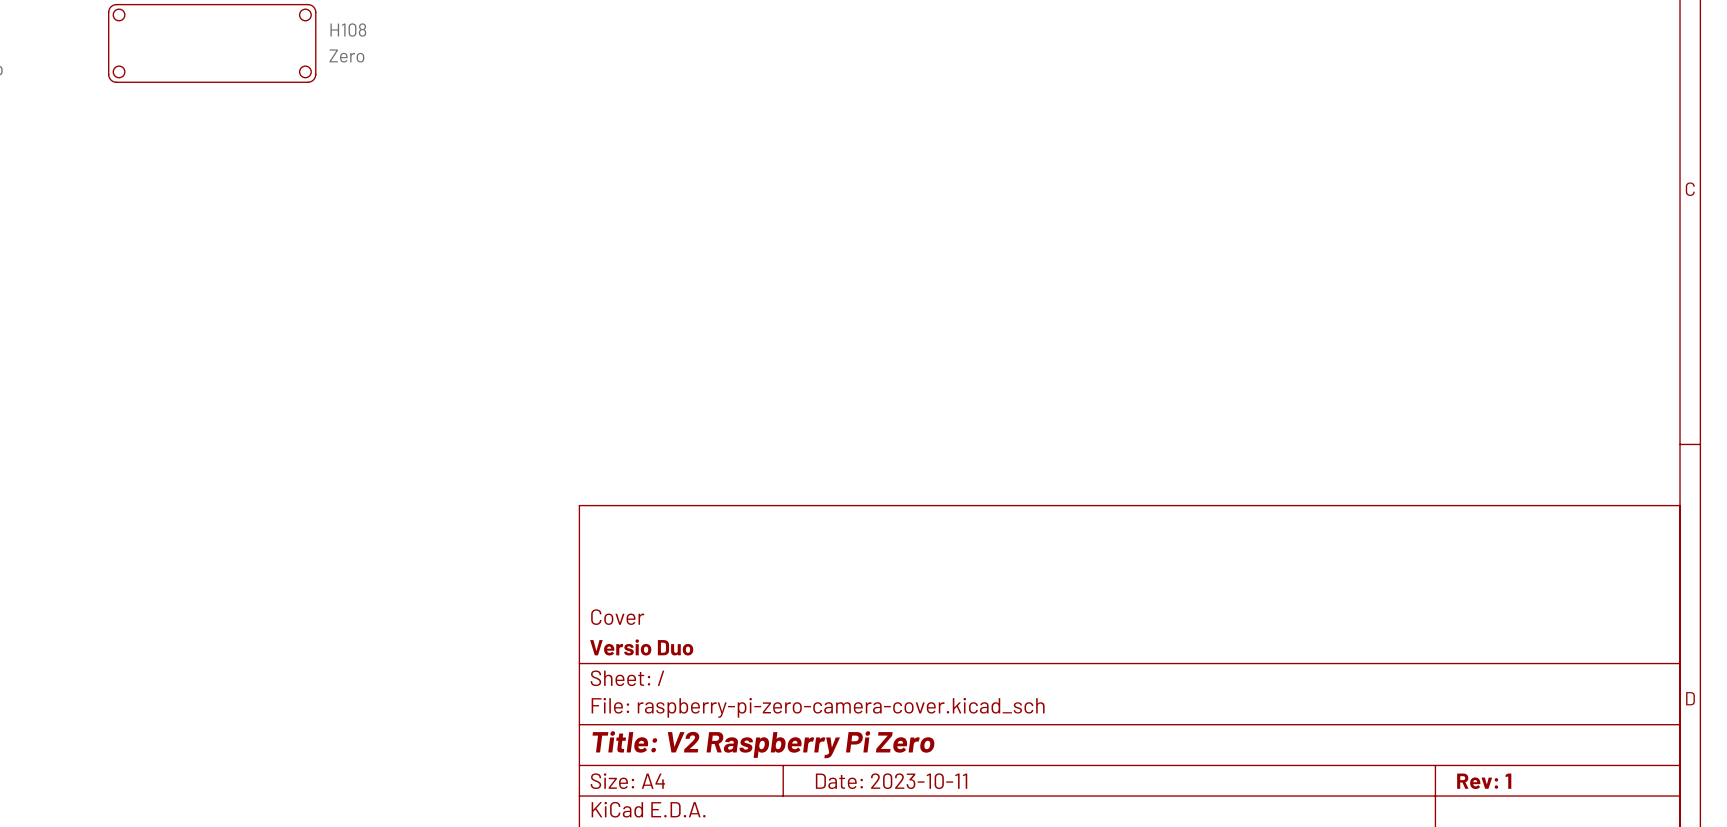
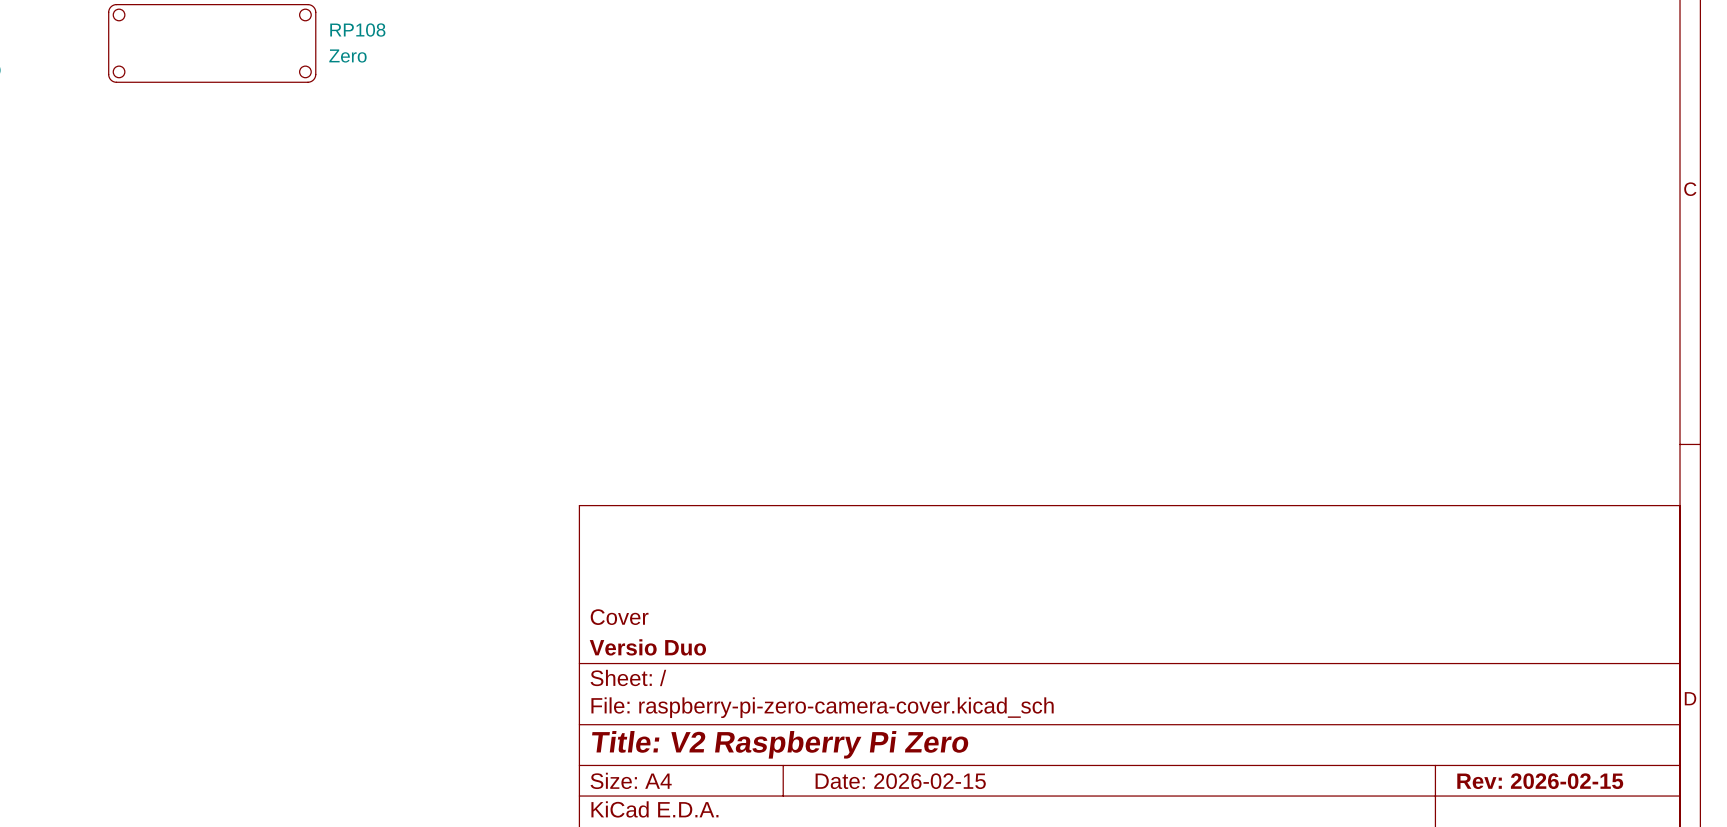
H108 name: H108 (348, 30) -> RP108 (357, 30)
title block: Date: 2023-10-11 (891, 781) -> Date: 2026-02-15 (900, 781)
title block: Rev: 1 (1484, 781) -> Rev: 2026-02-15 (1540, 781)

